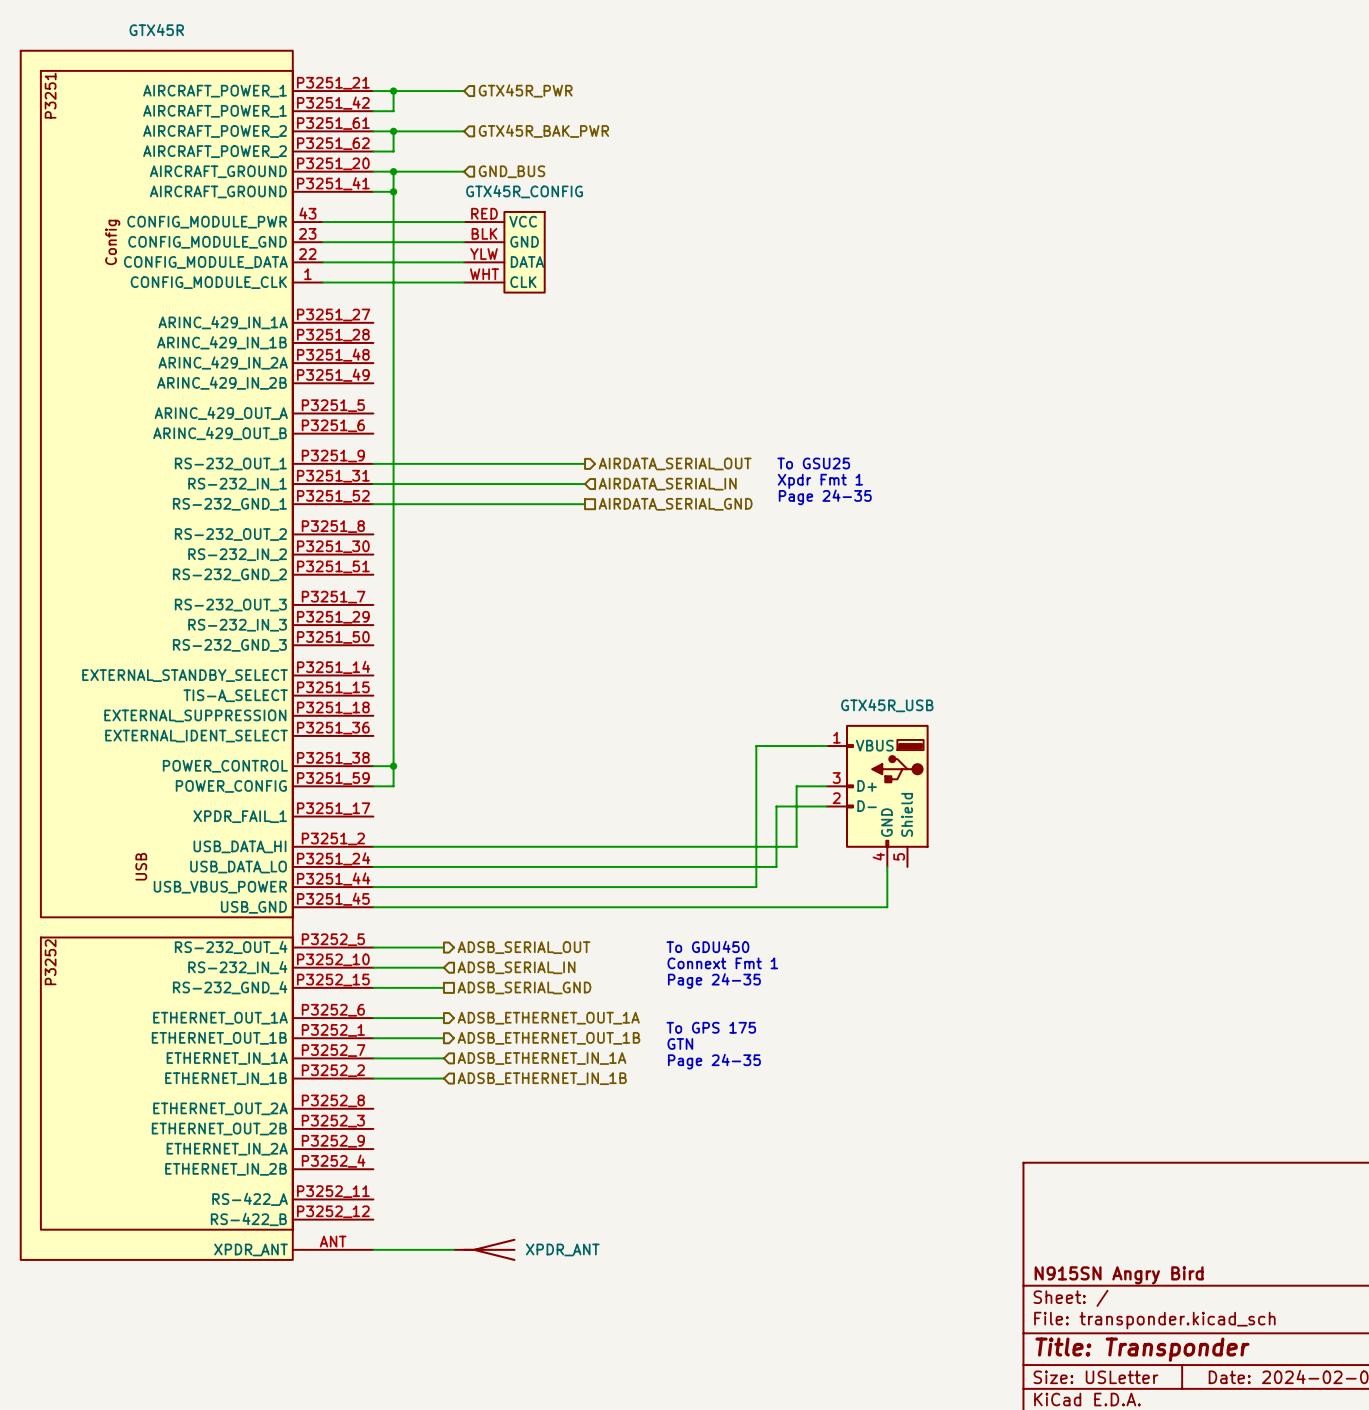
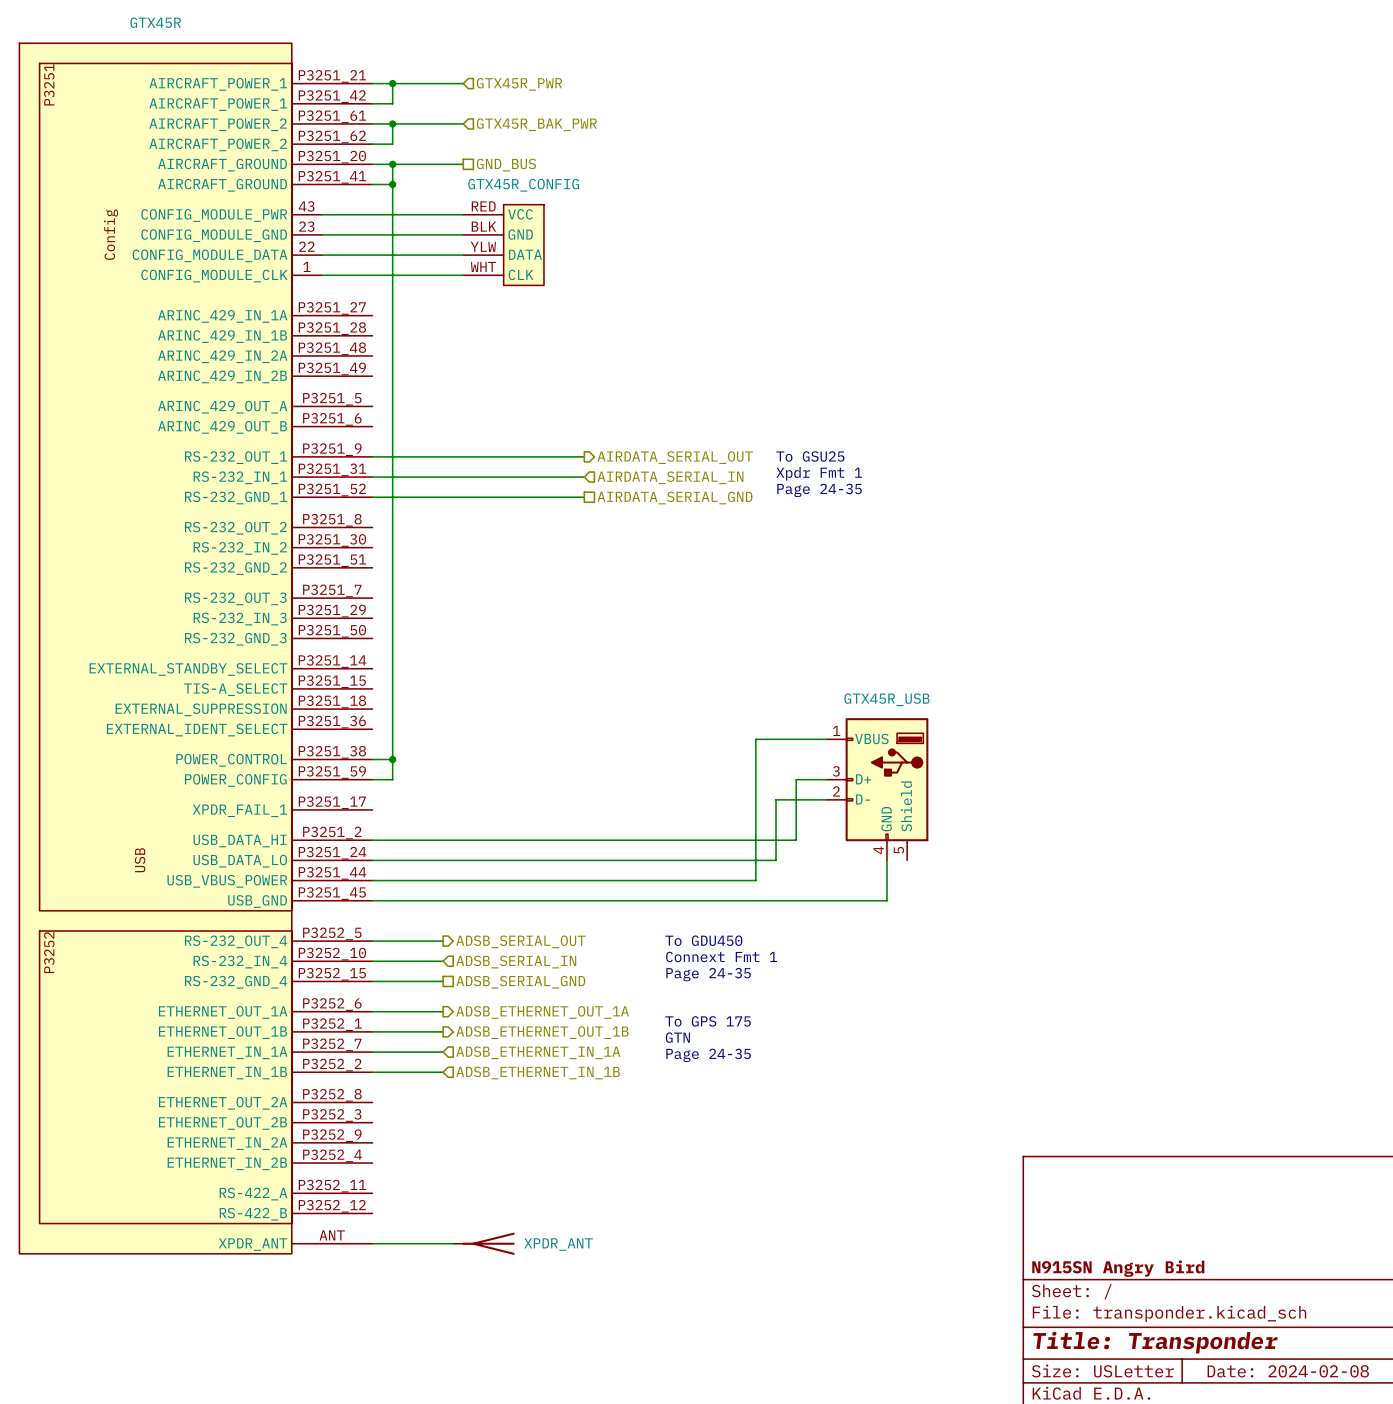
hierarchical label shape: input (512, 171) -> passive (506, 165)

